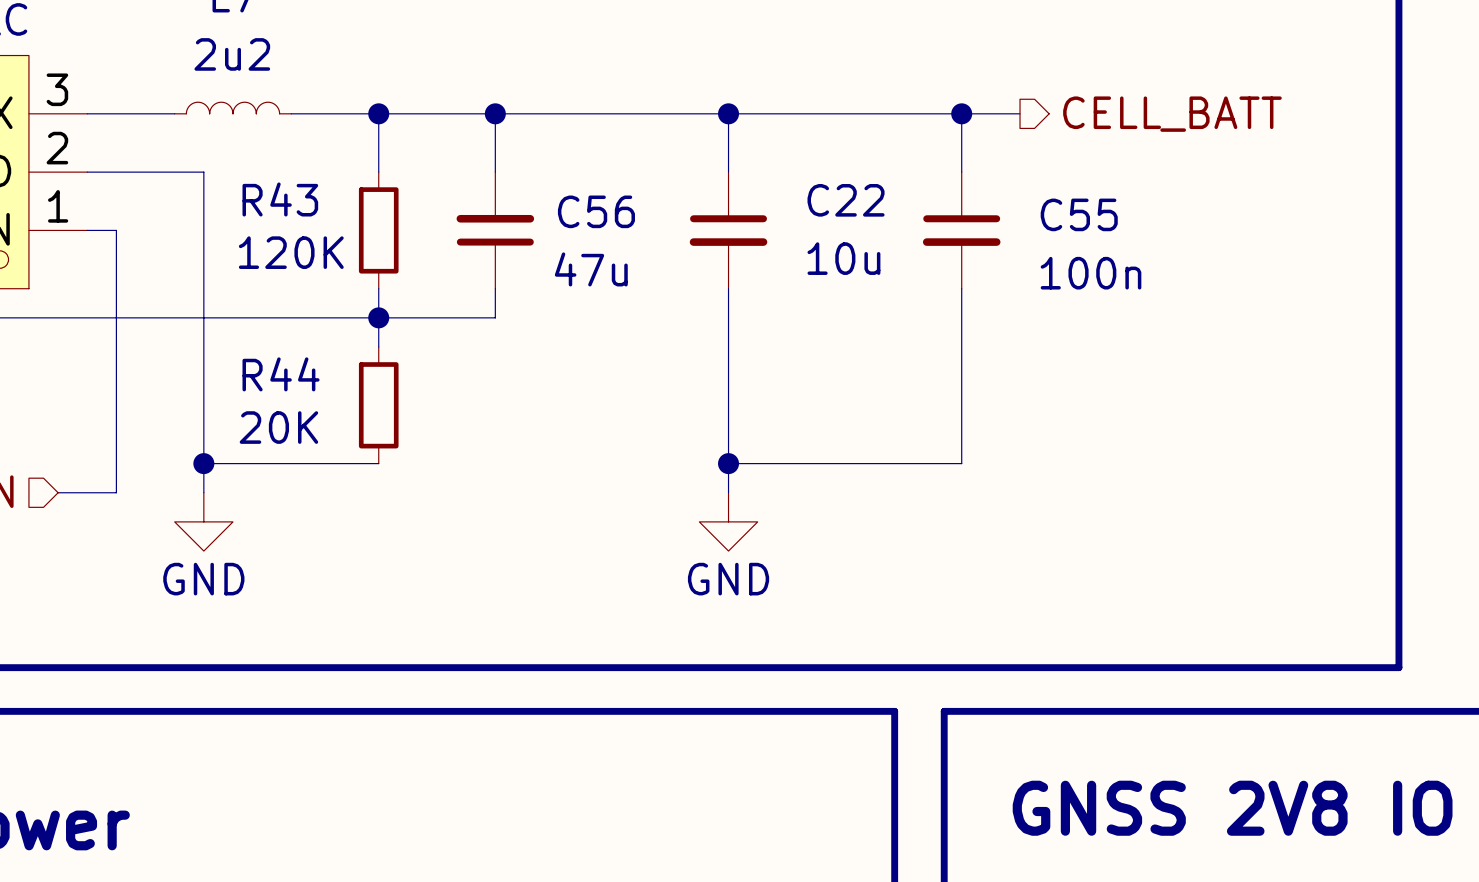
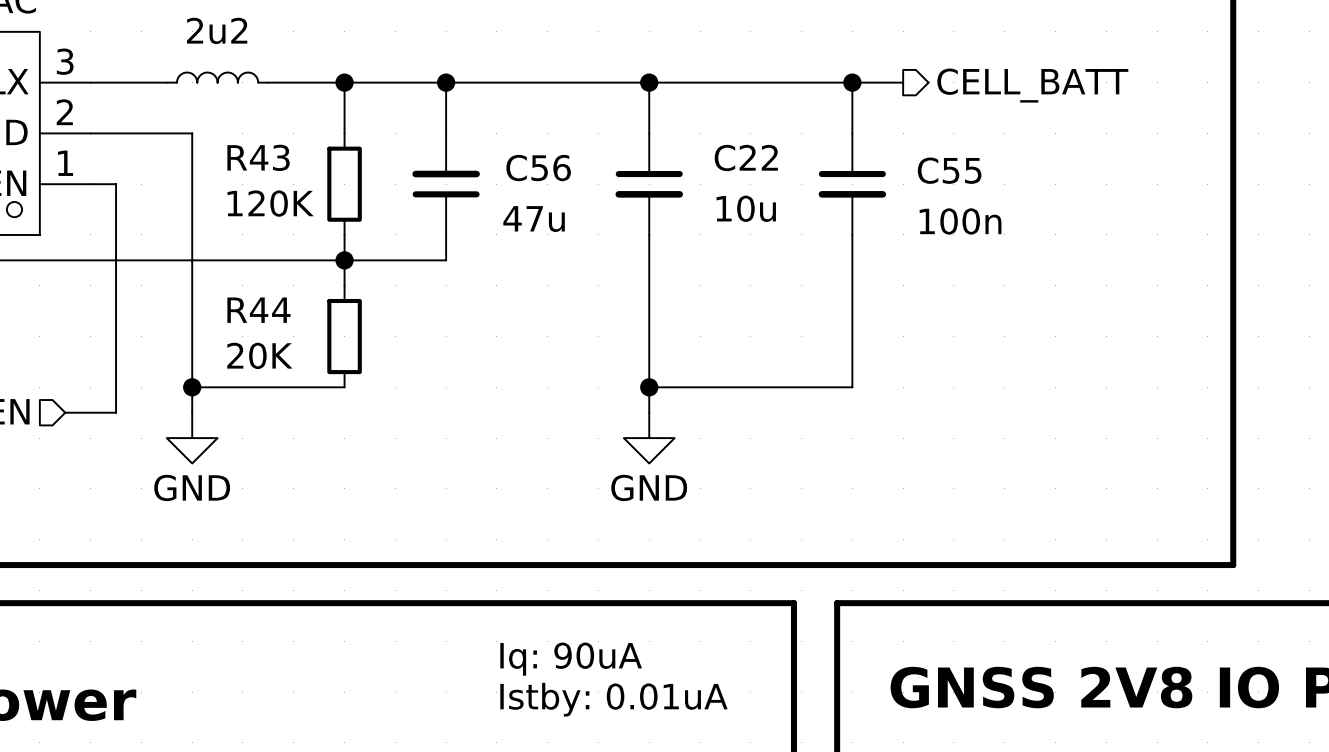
text: none -> Iq: 90uA (571, 659)
text: none -> Istby: 0.01uA (613, 699)

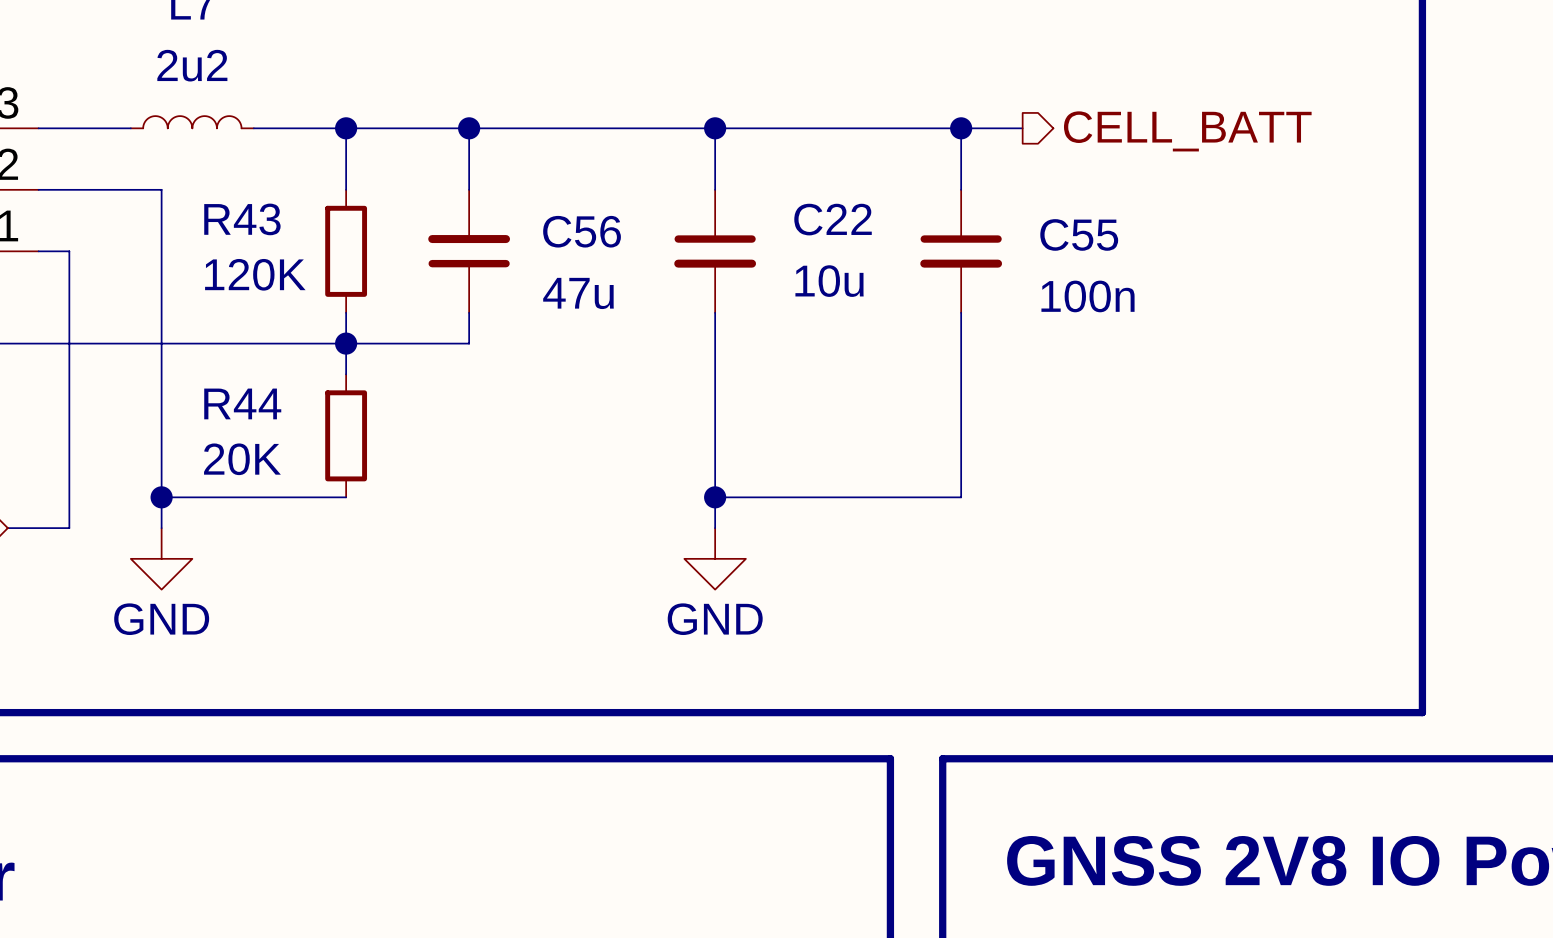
text: Iq: 90uA (571, 659) -> none
text: Istby: 0.01uA (613, 699) -> none

